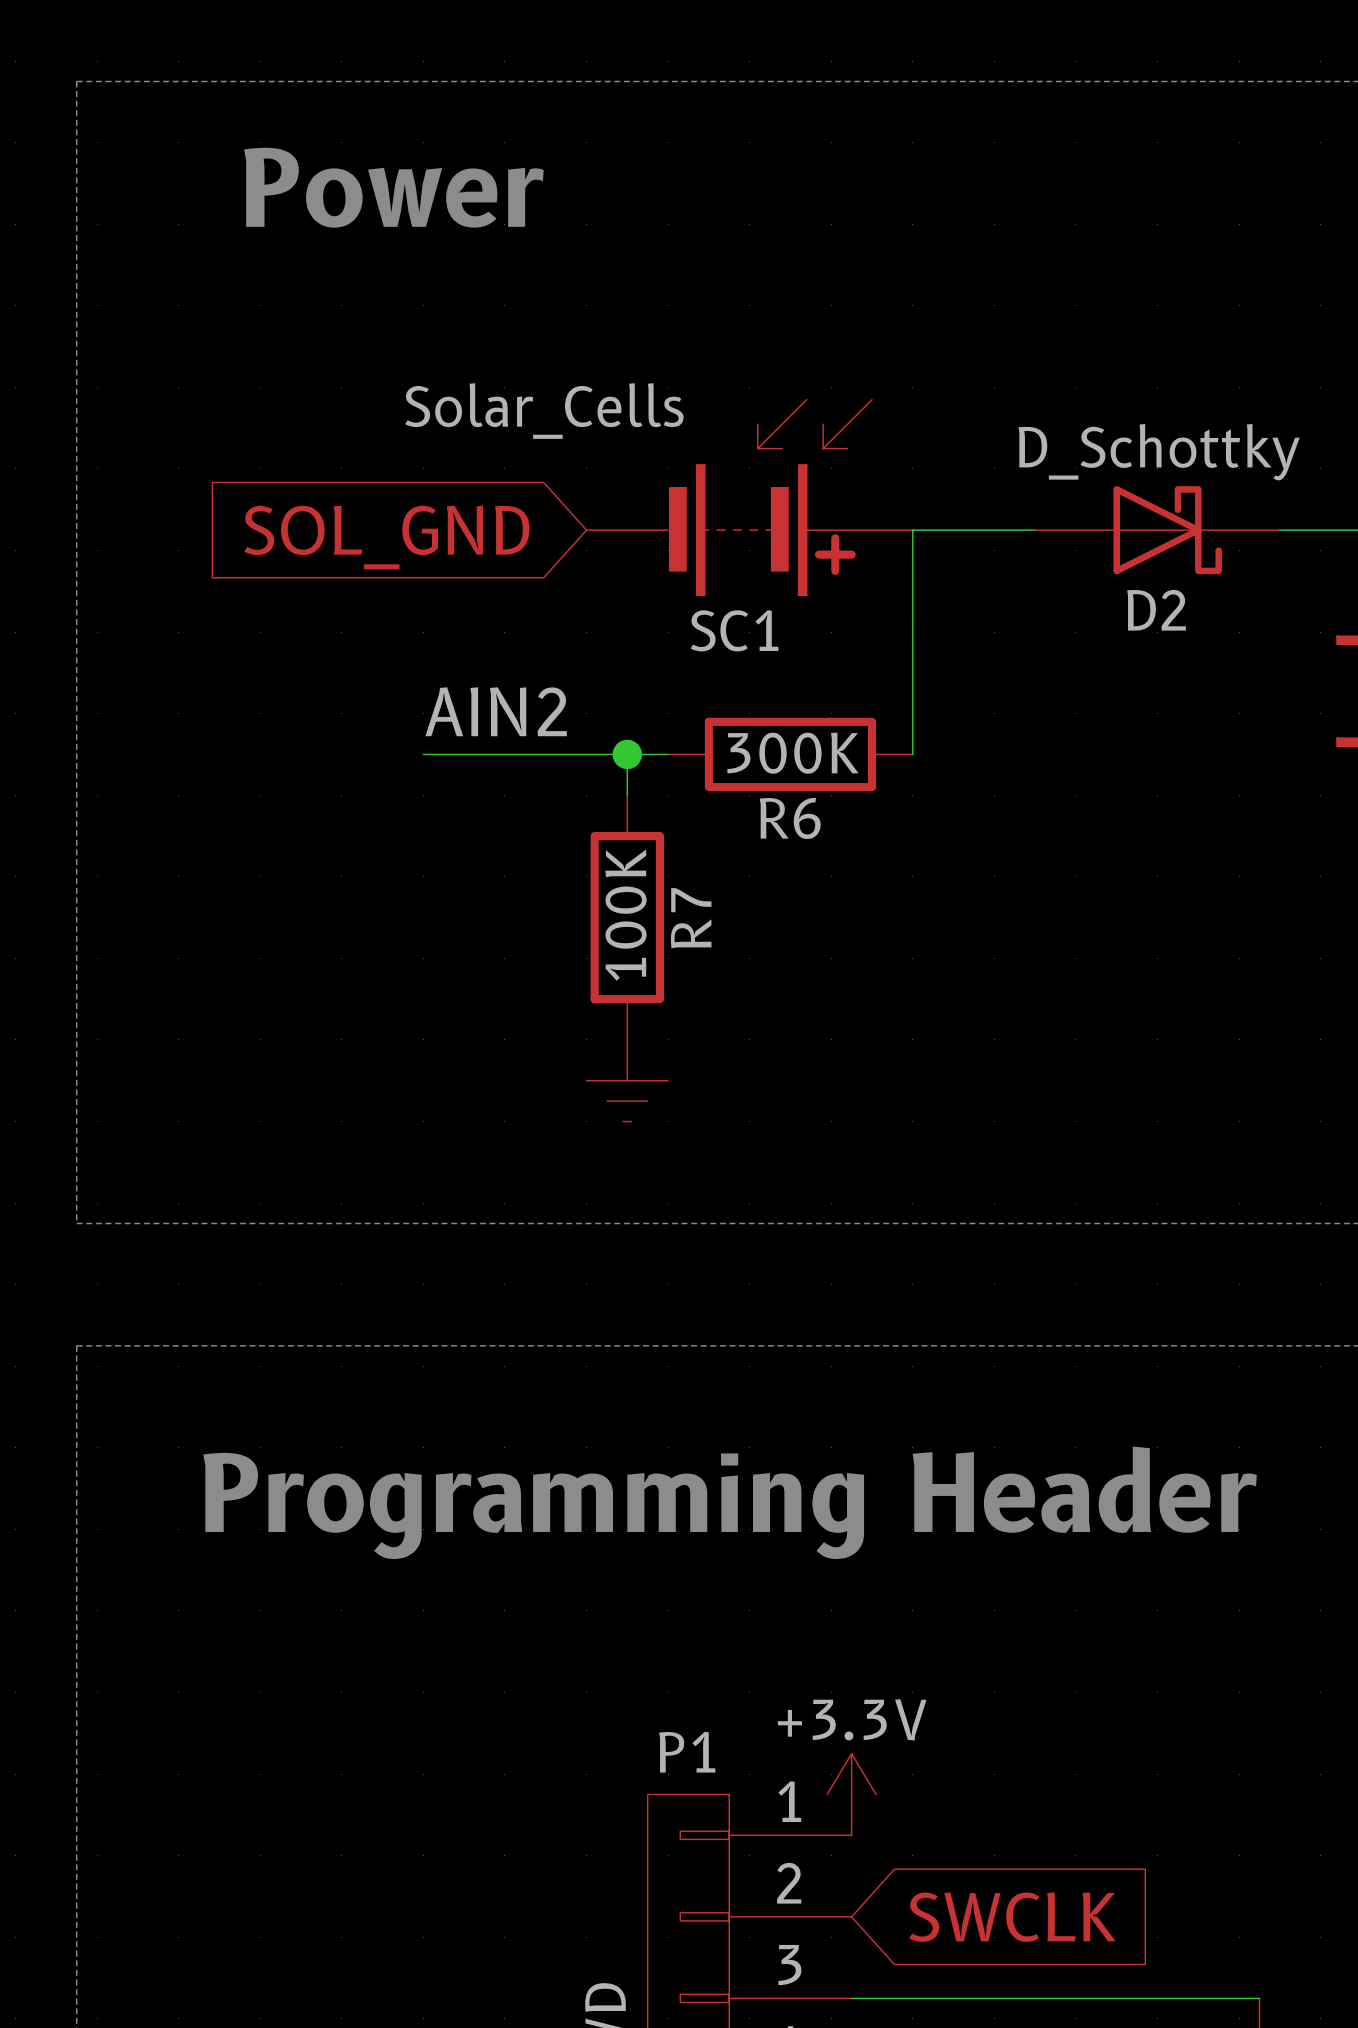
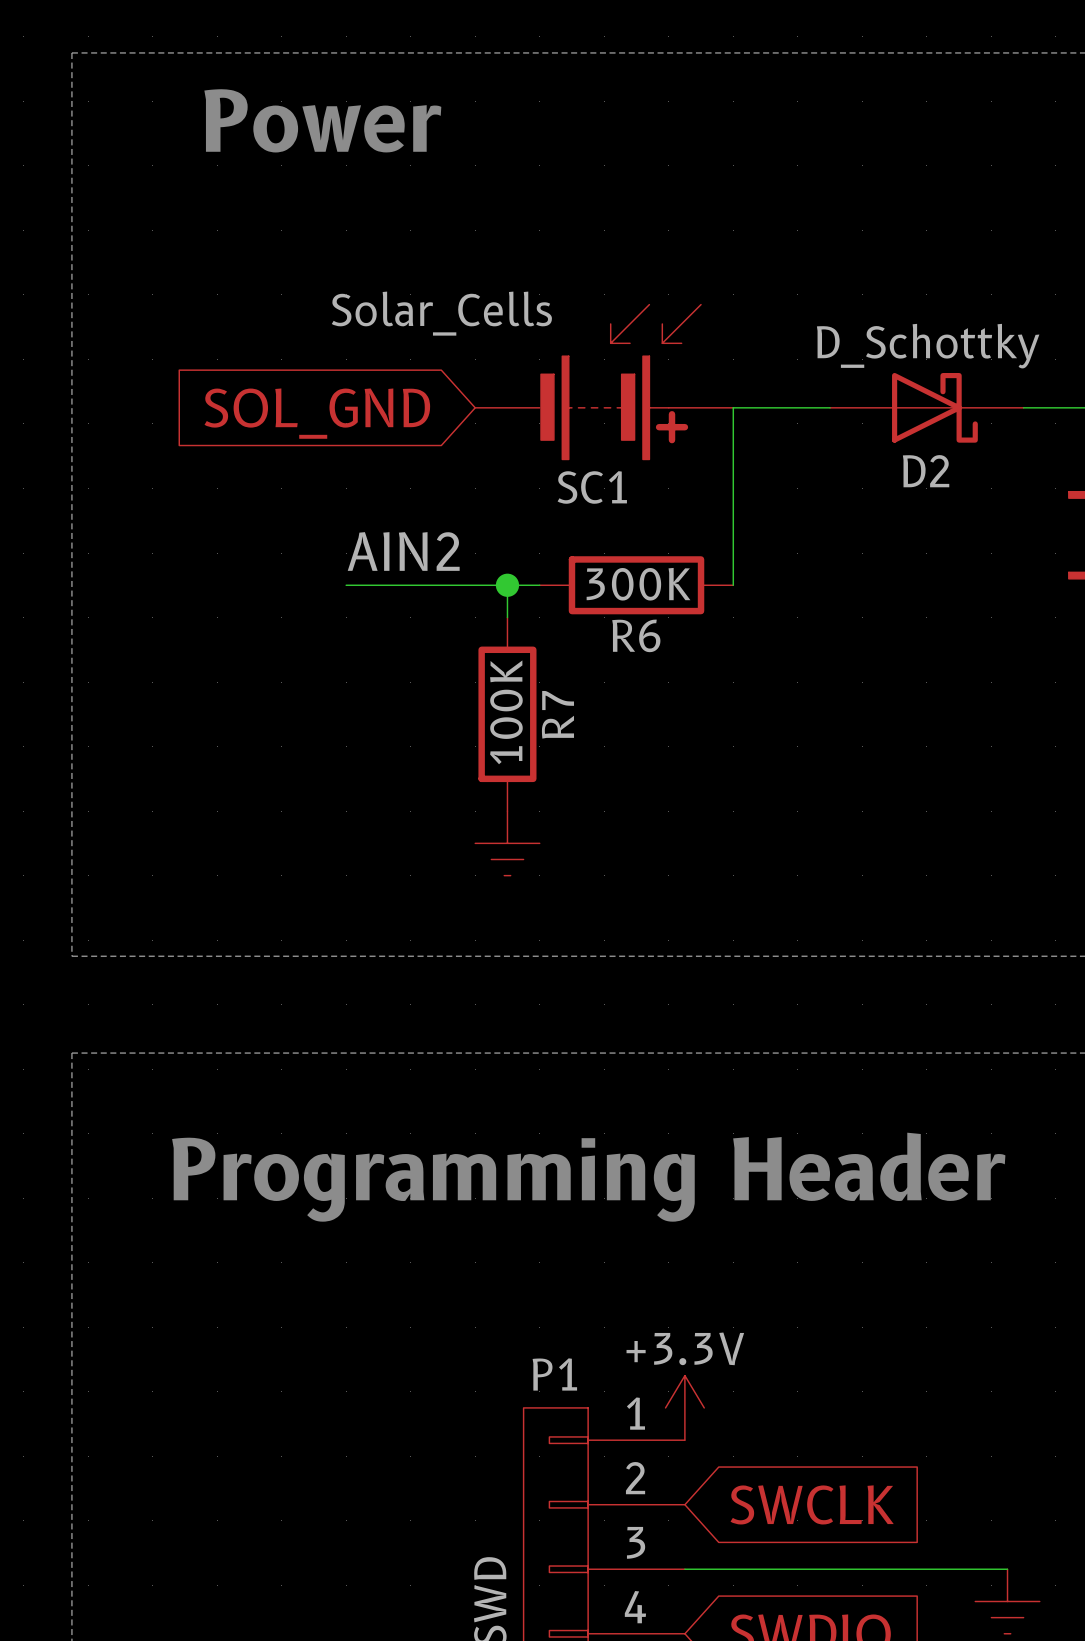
text position: Power (393, 187) -> Power (322, 120)

